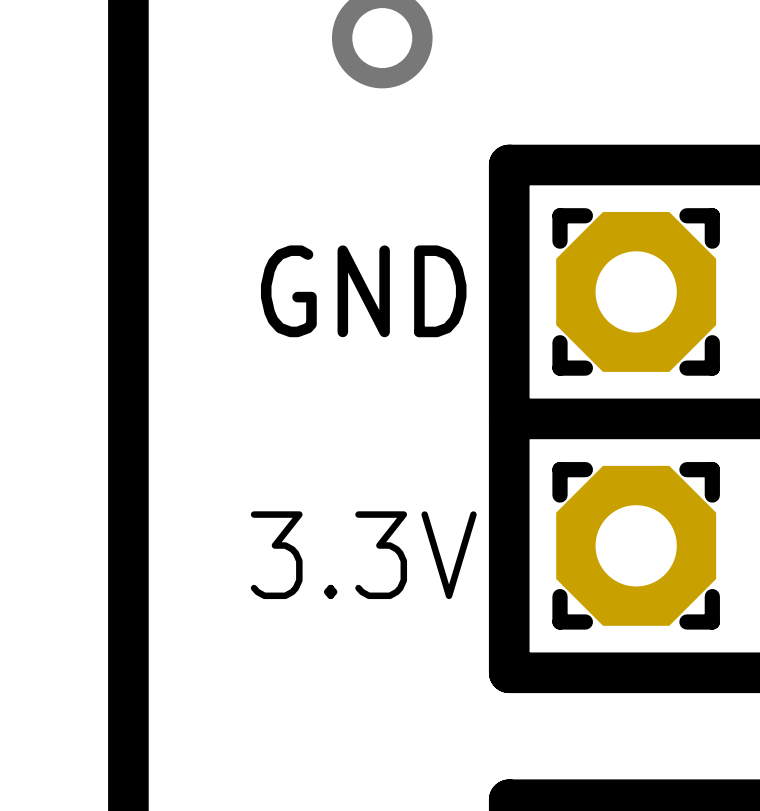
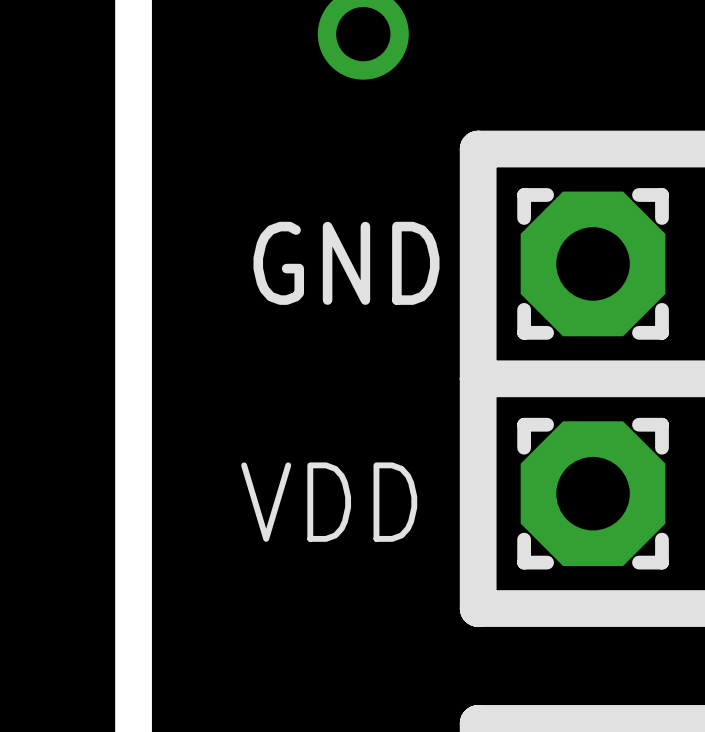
text: 3.3V (363, 555) -> VDD (329, 502)

